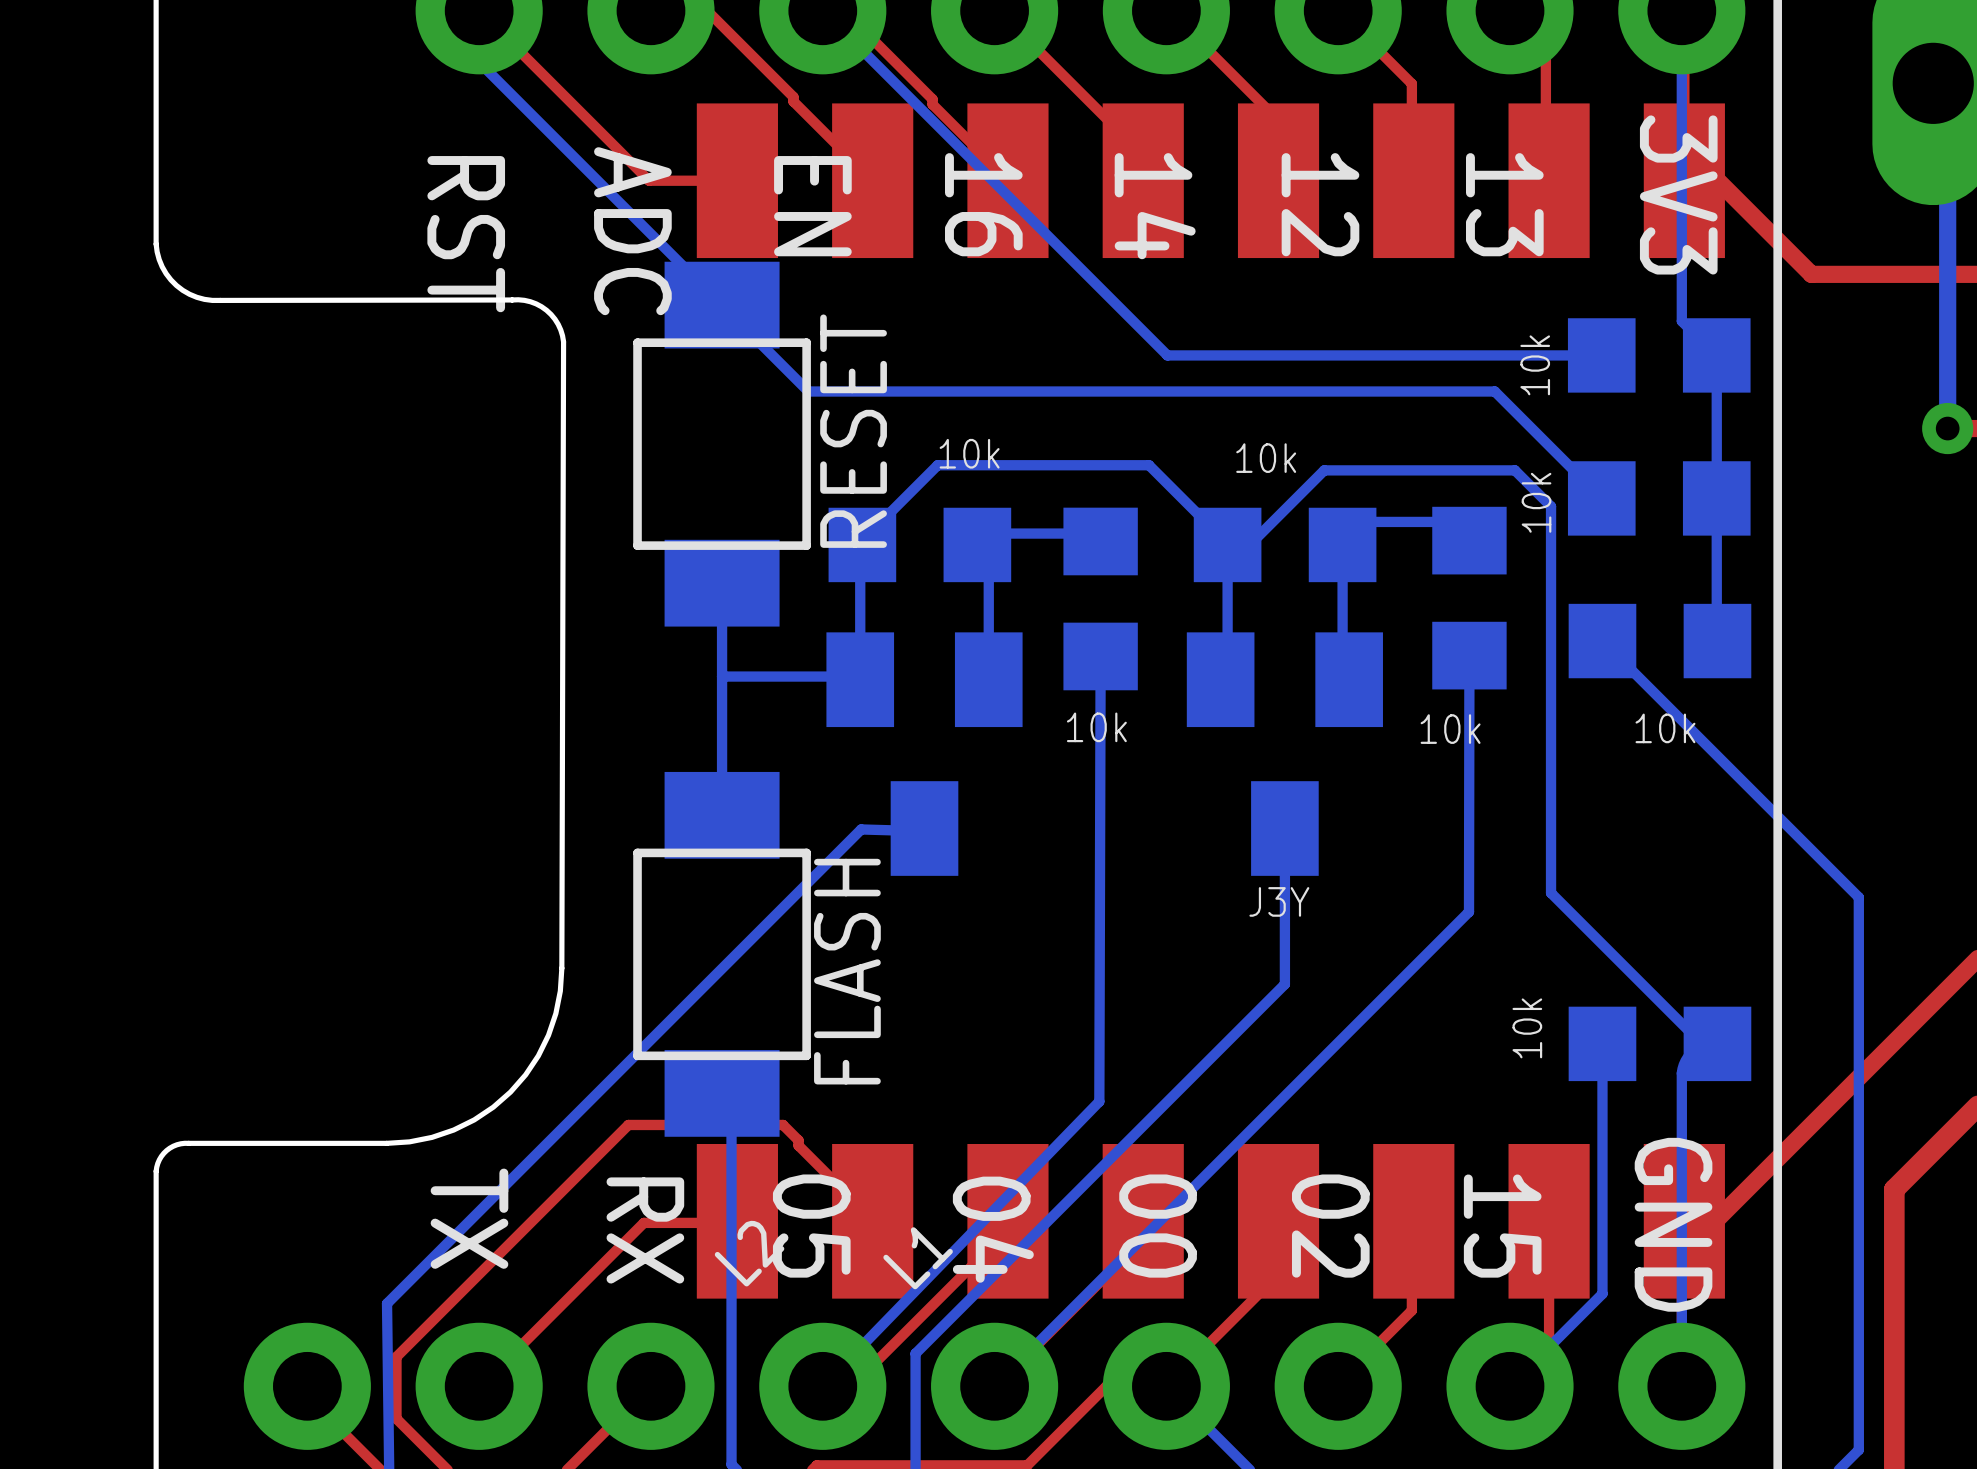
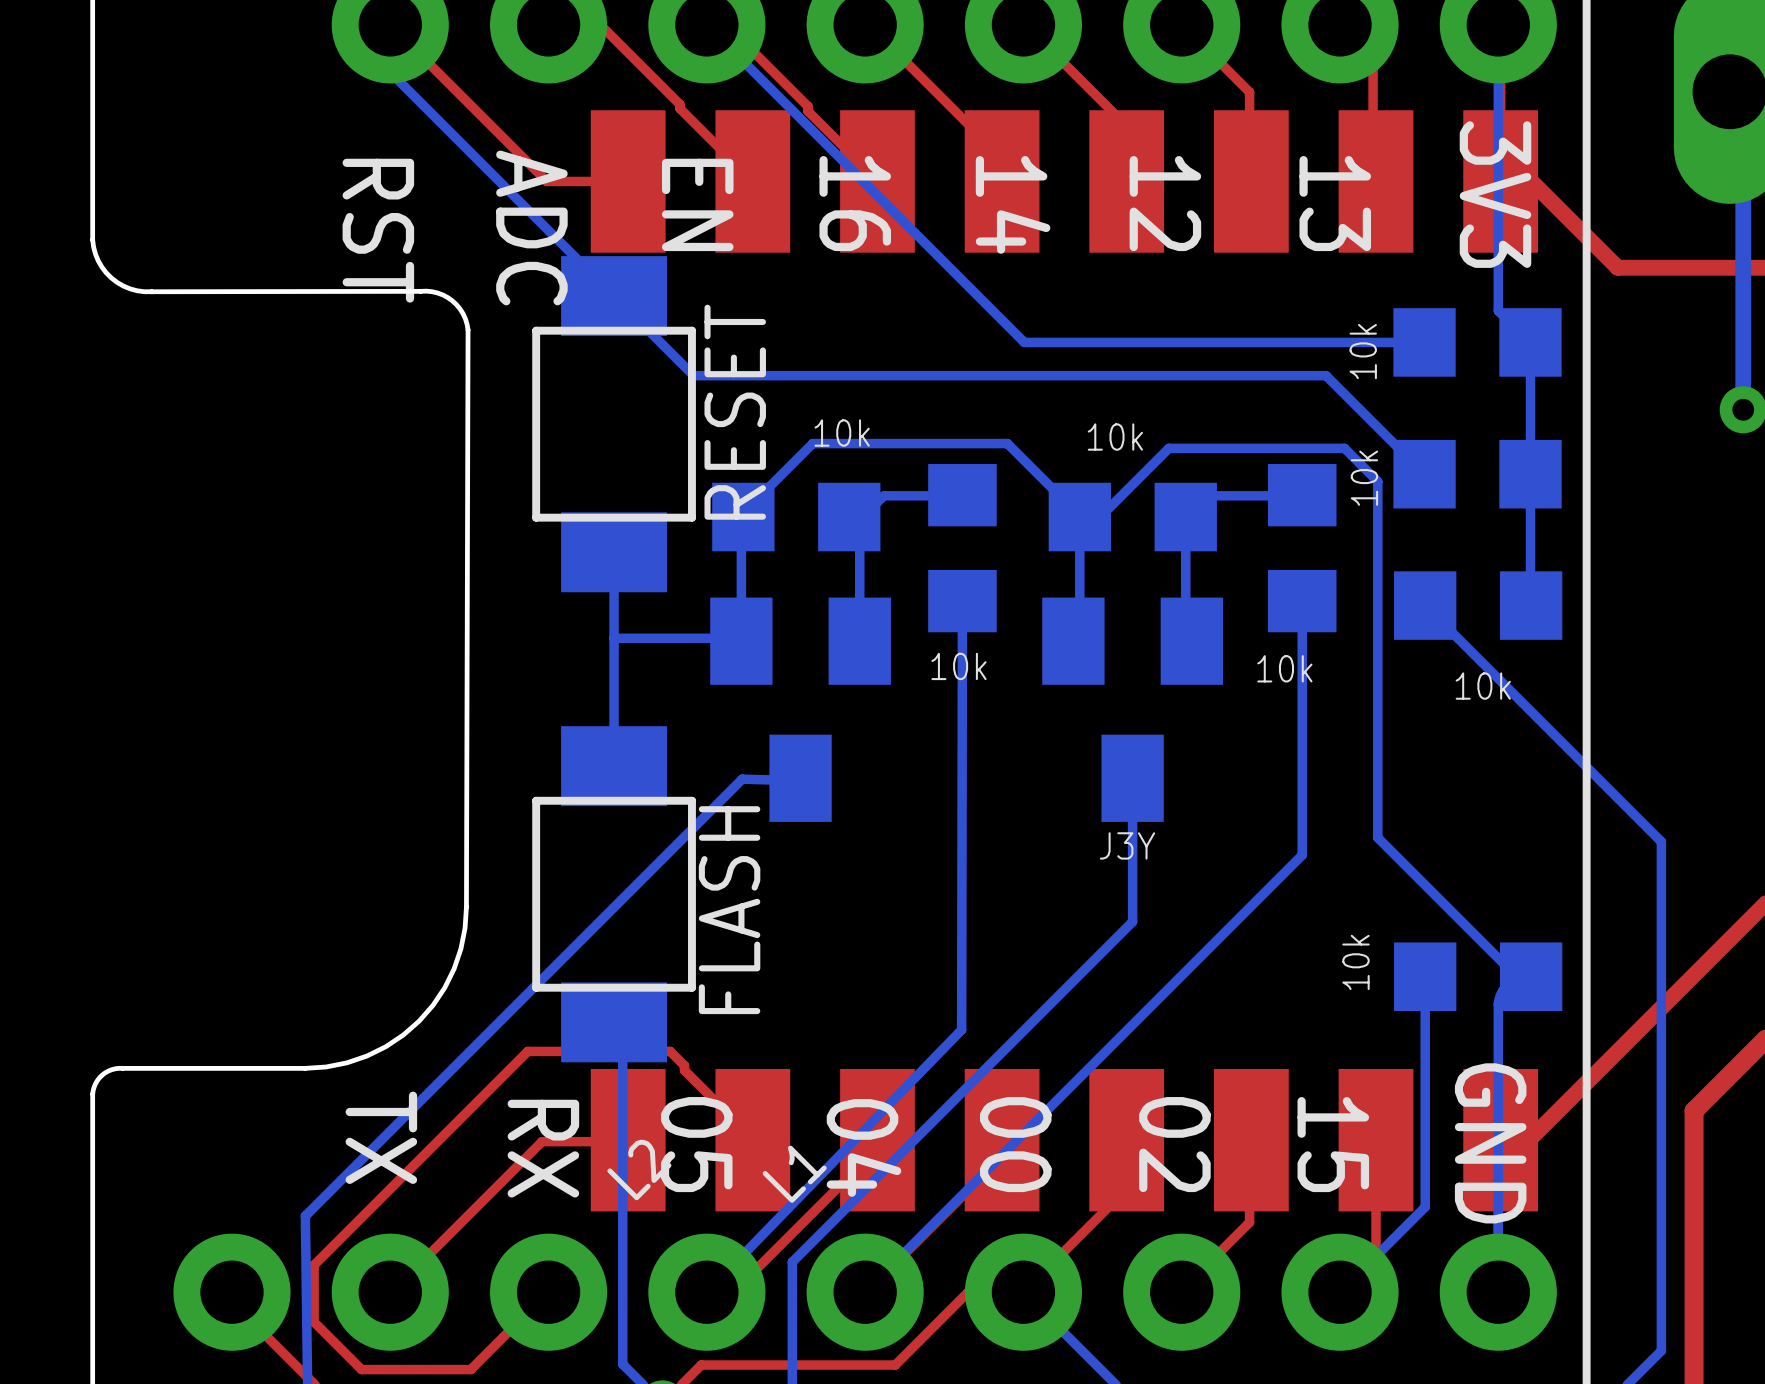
bottom track: (1100, 541) (1074, 533) (992, 533) (989, 547) -> (962, 495) (883, 495) (860, 519)
part position: (1100, 598) -> (962, 548)
part position: (1469, 598) -> (1302, 548)
bottom track: (1469, 655) (1469, 911) -> (1302, 601) (1302, 855)
bottom track: (1100, 656) (1099, 1101) -> (962, 601) (961, 1029)

